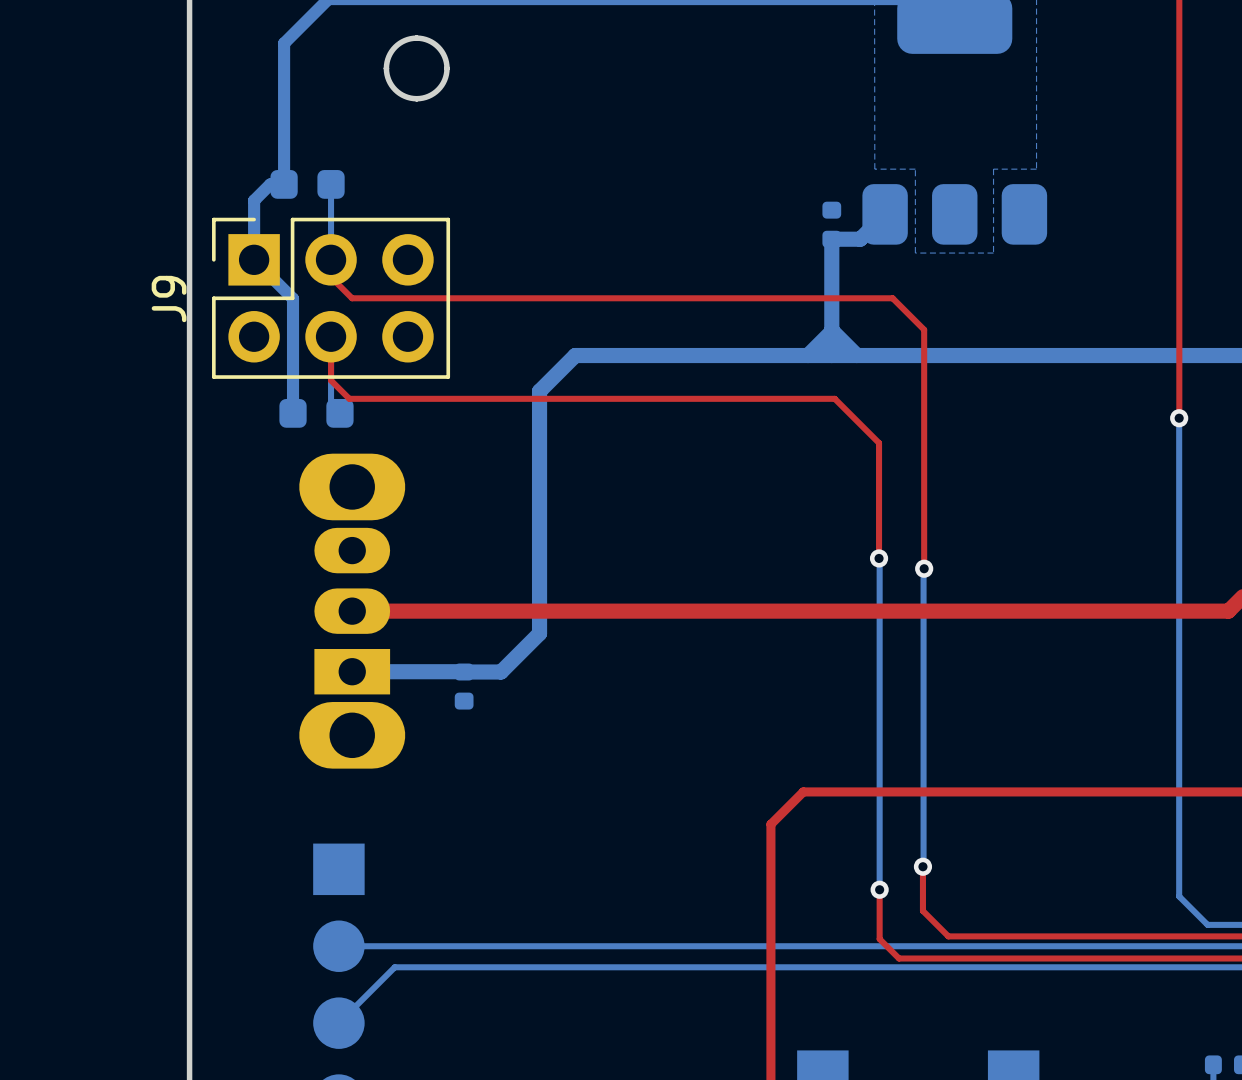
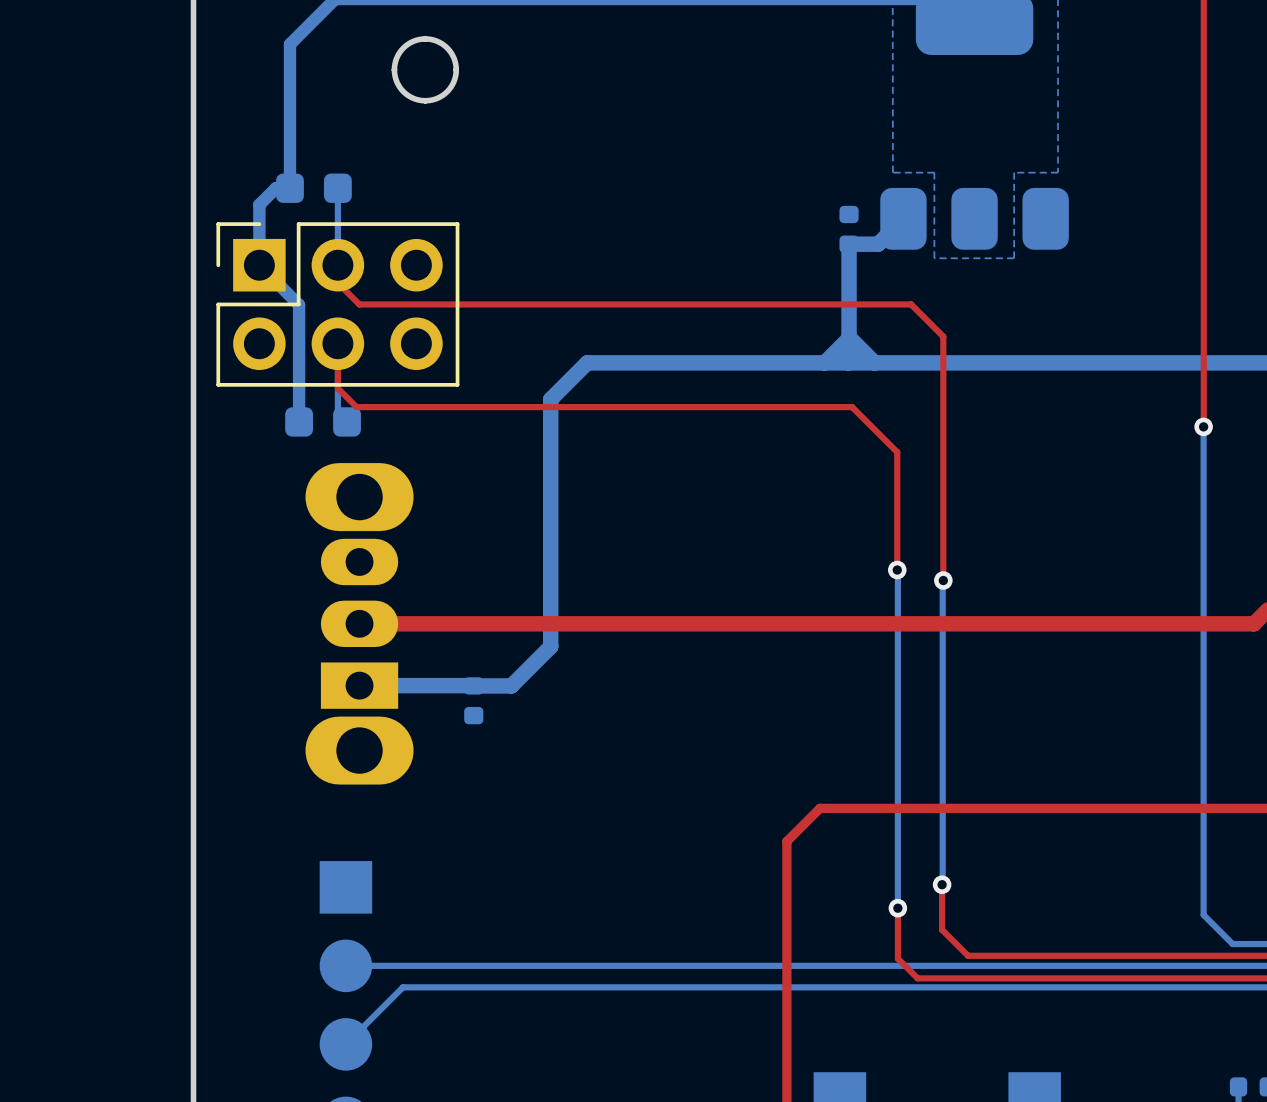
J9 name: J9 (169, 299) -> none

